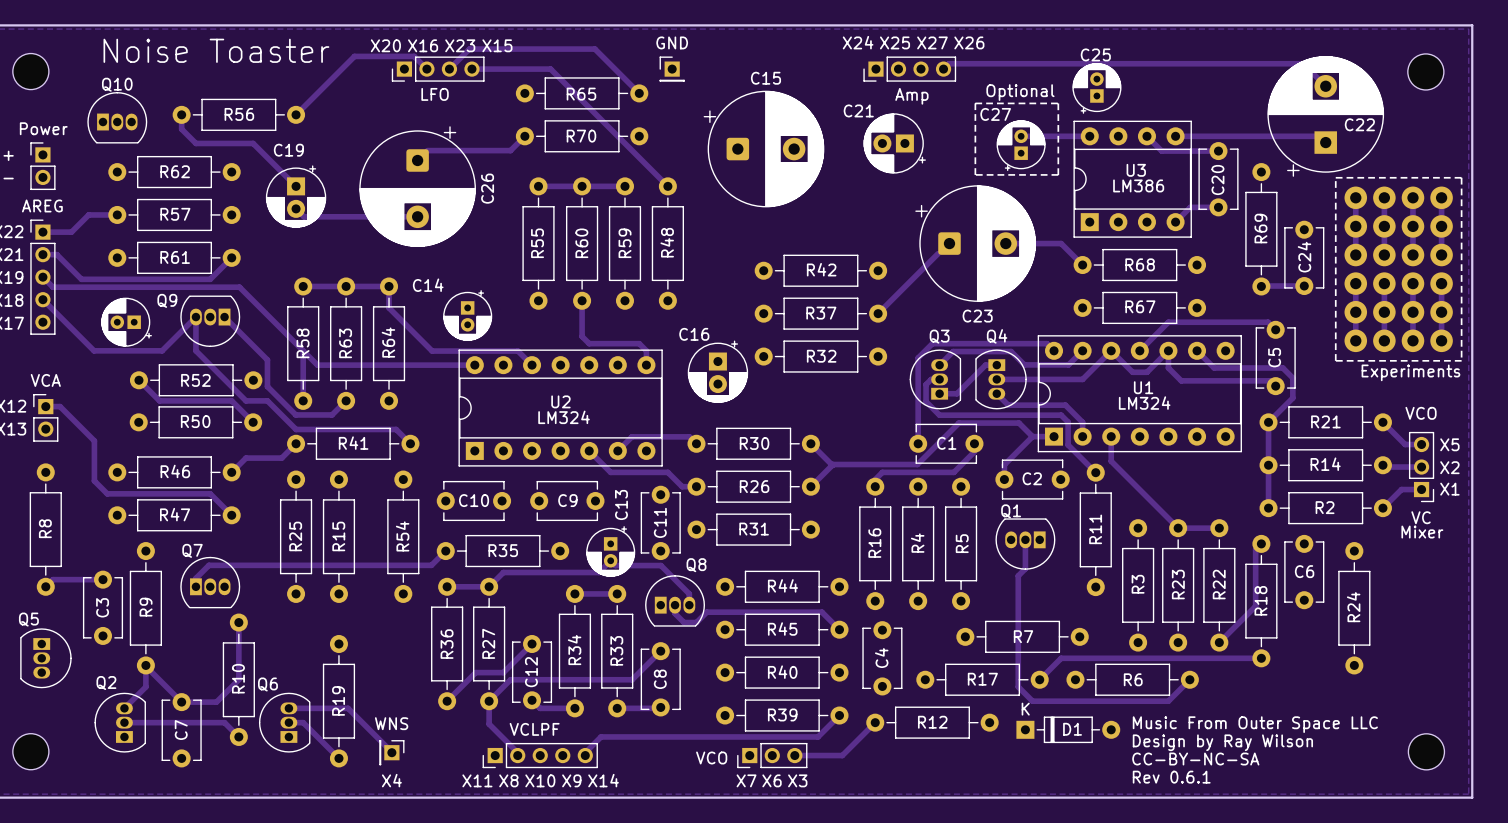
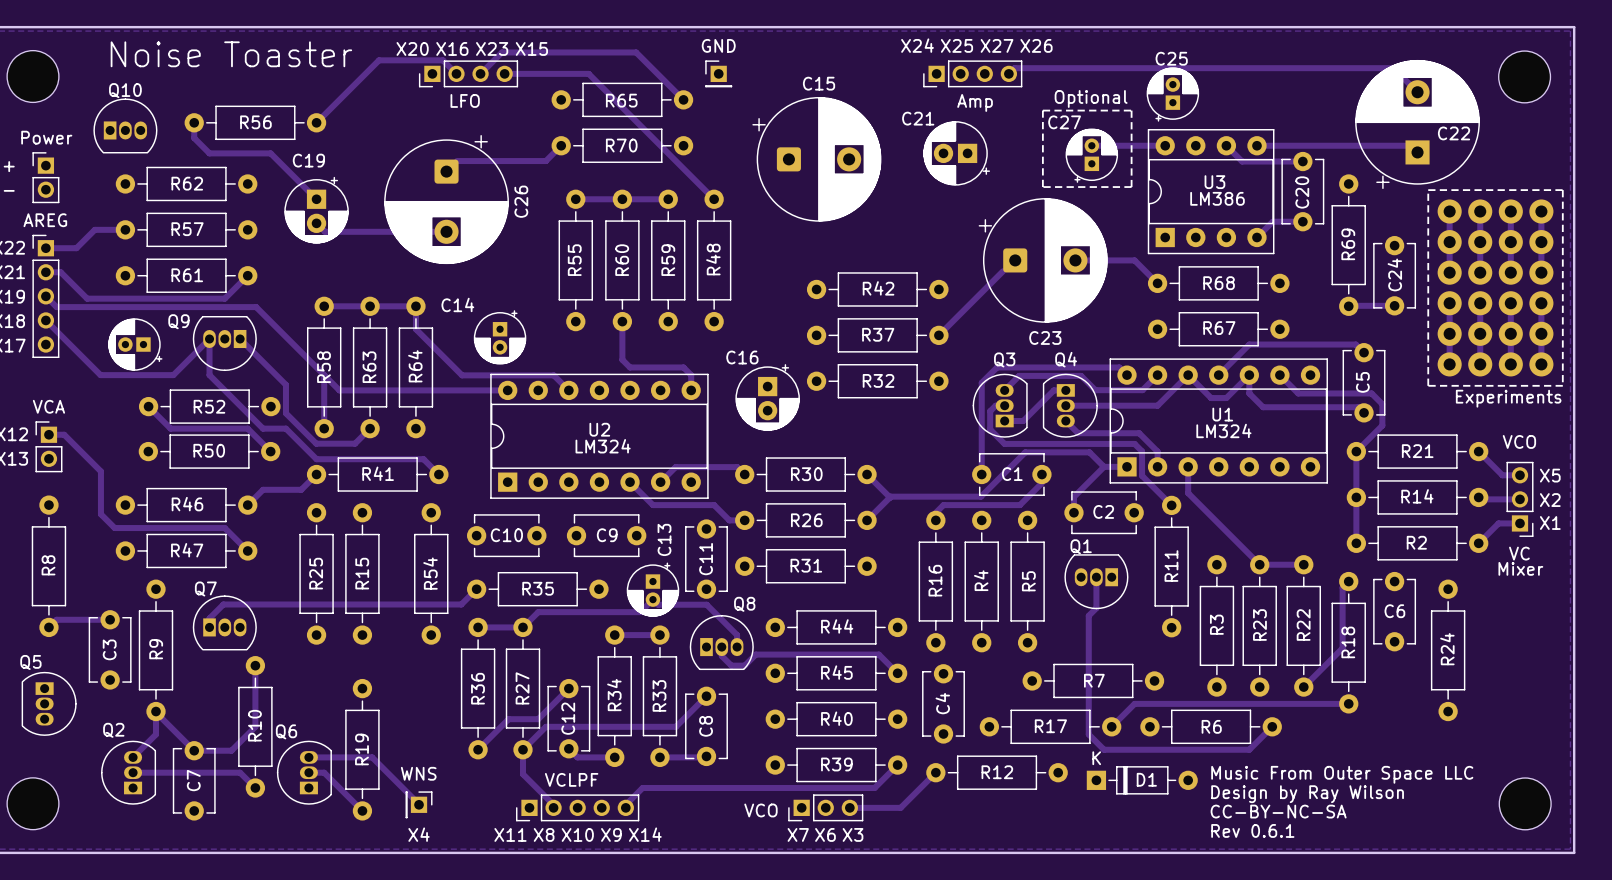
part footprint: [12, 53, 49, 90] -> [7, 50, 59, 103]
part footprint: [1407, 53, 1444, 90] -> [1498, 51, 1551, 103]
part footprint: [12, 733, 49, 770] -> [7, 777, 59, 830]
part footprint: [1408, 733, 1445, 770] -> [1499, 778, 1552, 830]

